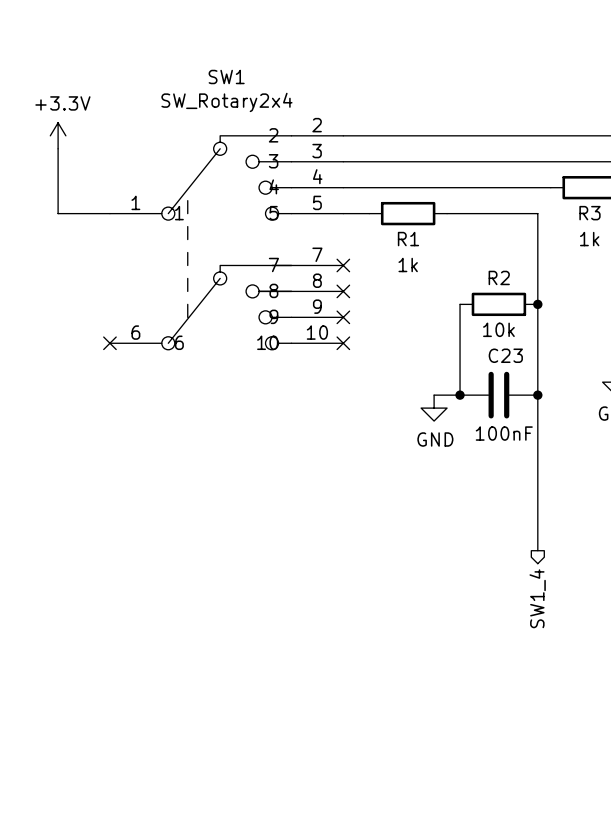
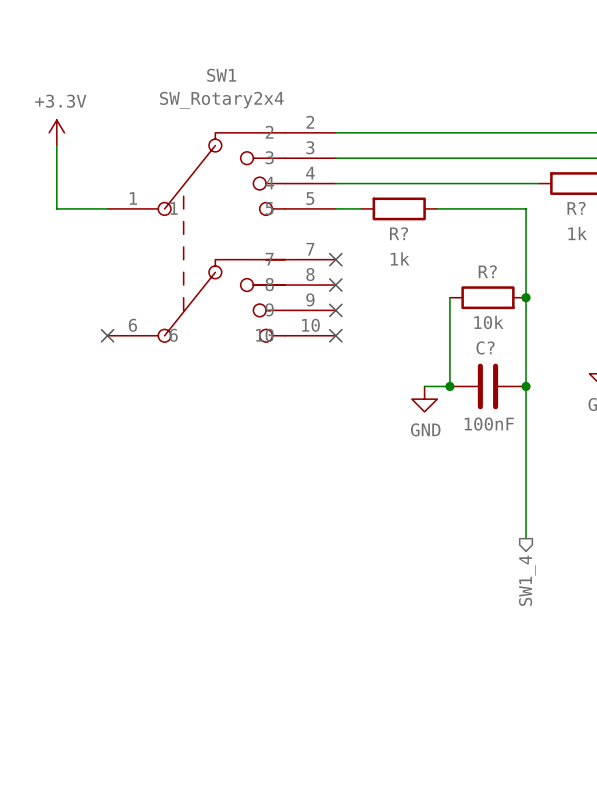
R3 name: R3 (589, 213) -> R? (576, 208)
R1 name: R1 (408, 239) -> R? (399, 233)
R2 name: R2 (499, 277) -> R? (487, 271)
C23 name: C23 (505, 355) -> C? (485, 347)

